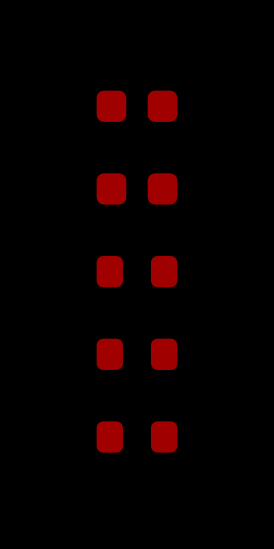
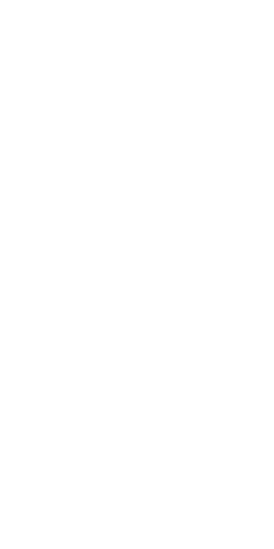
part: (136, 106) -> none
part: (136, 188) -> none
part: (136, 271) -> none
part: (136, 354) -> none
part: (136, 437) -> none

